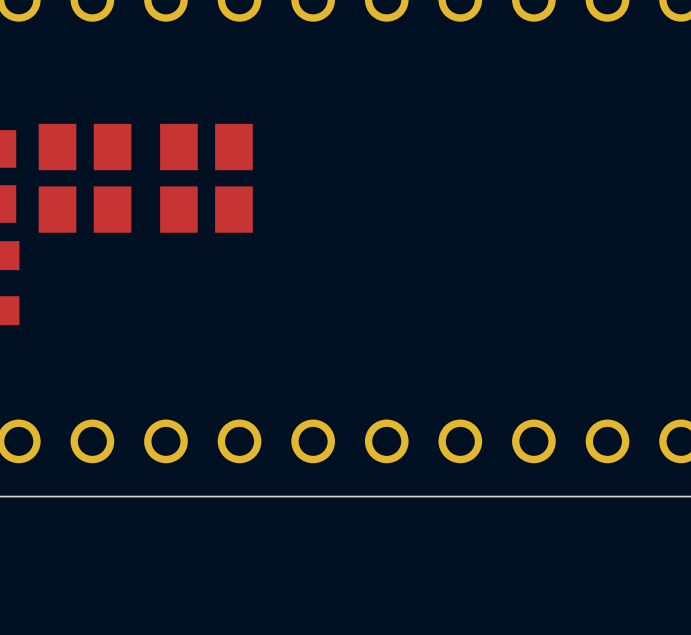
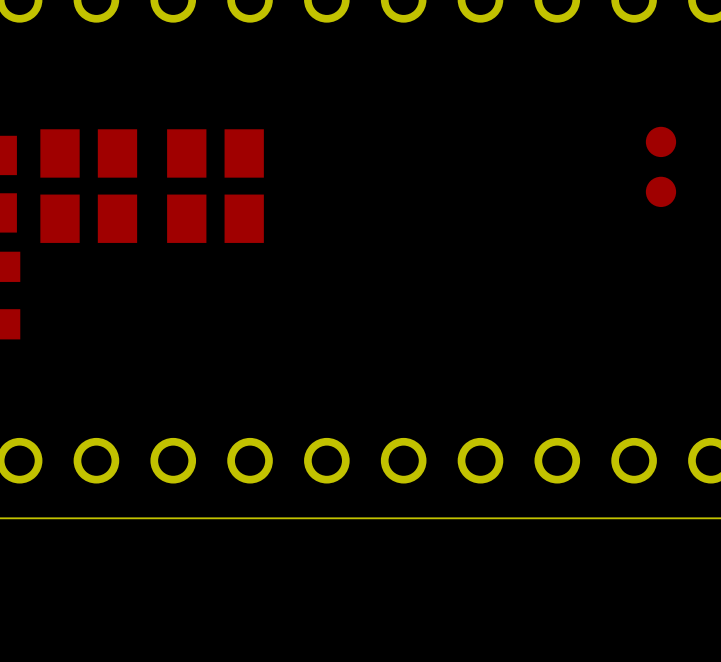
part: none -> (660, 141)
part: none -> (660, 191)

